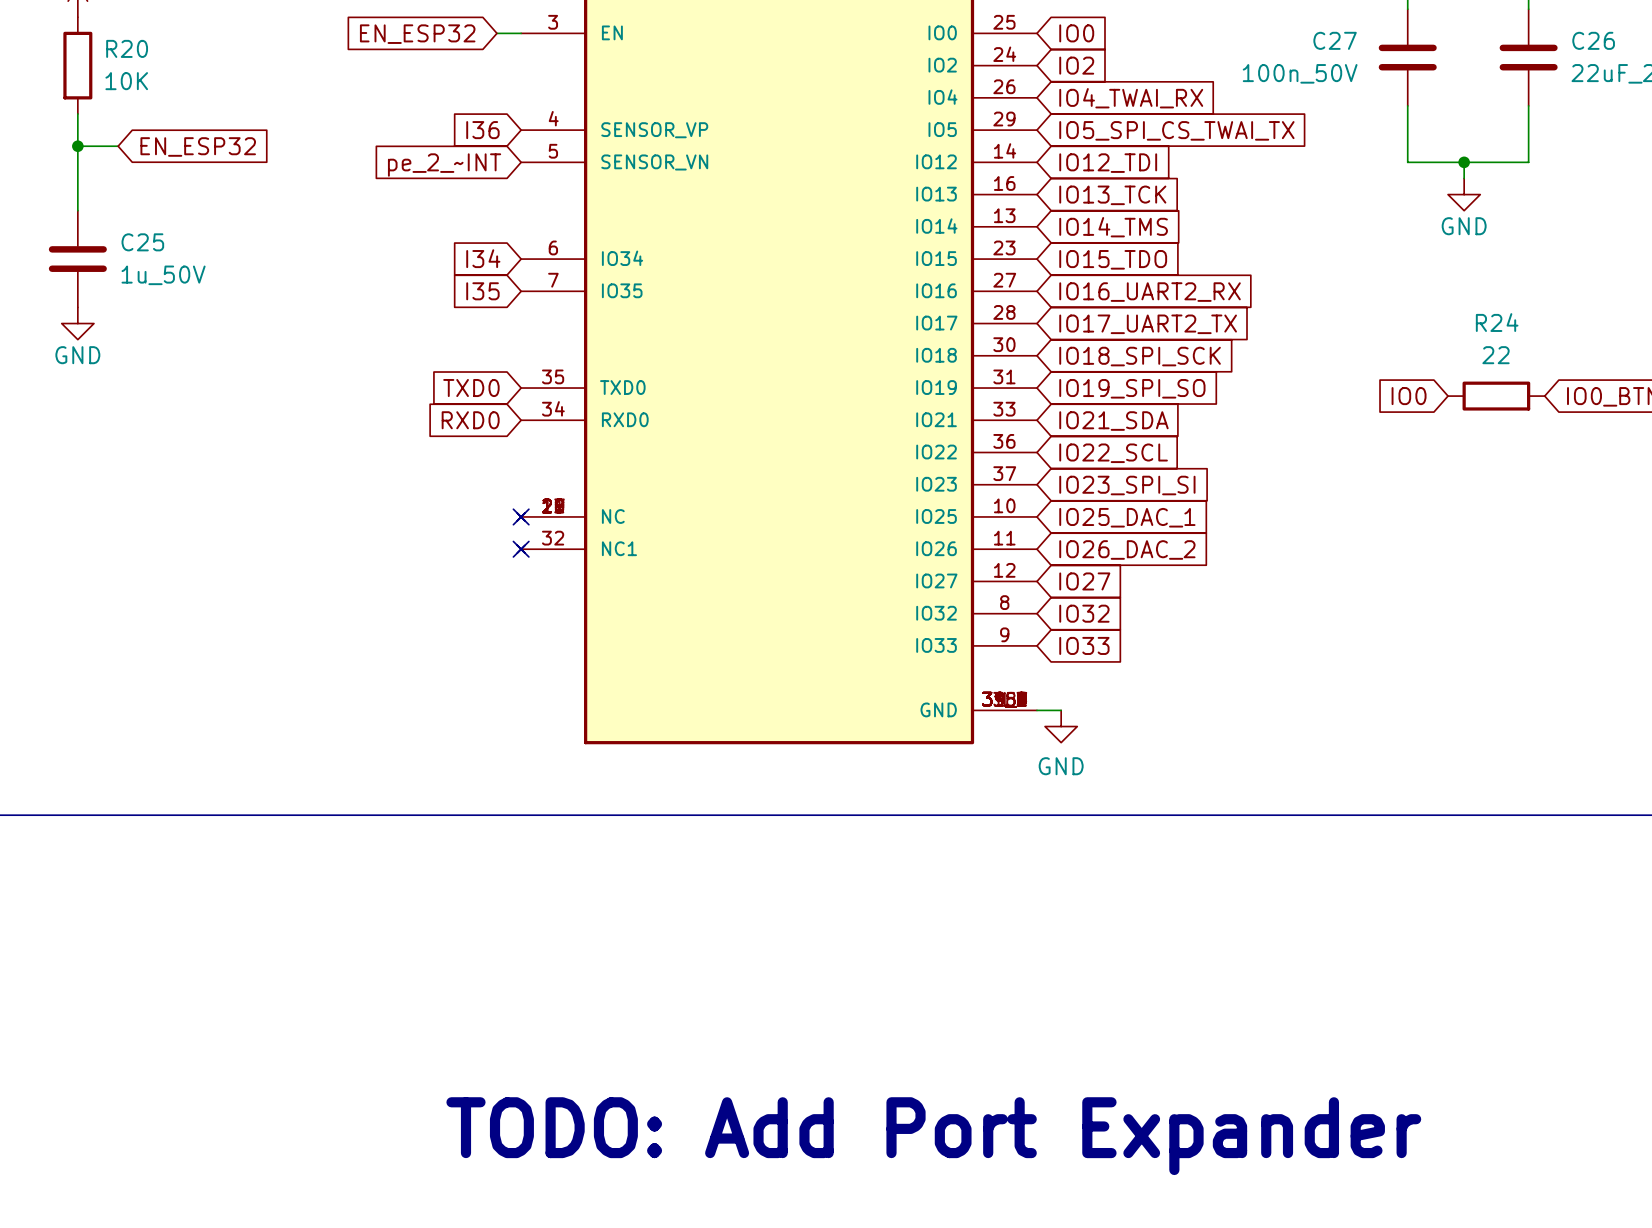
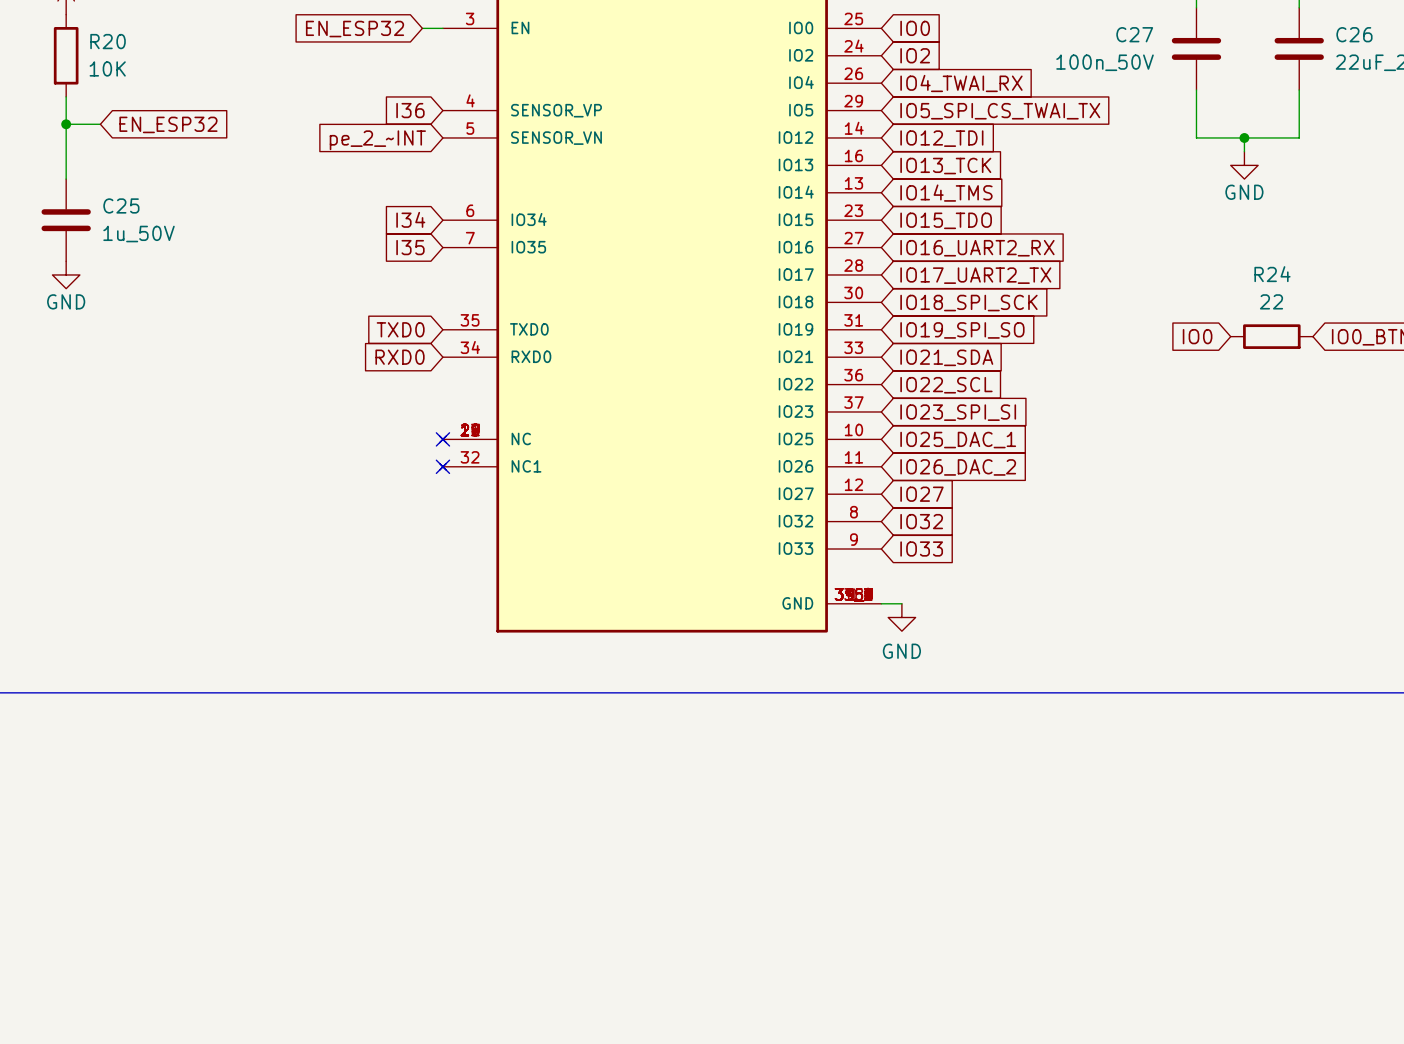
text: TODO: Add Port Expander (933, 1136) -> none

